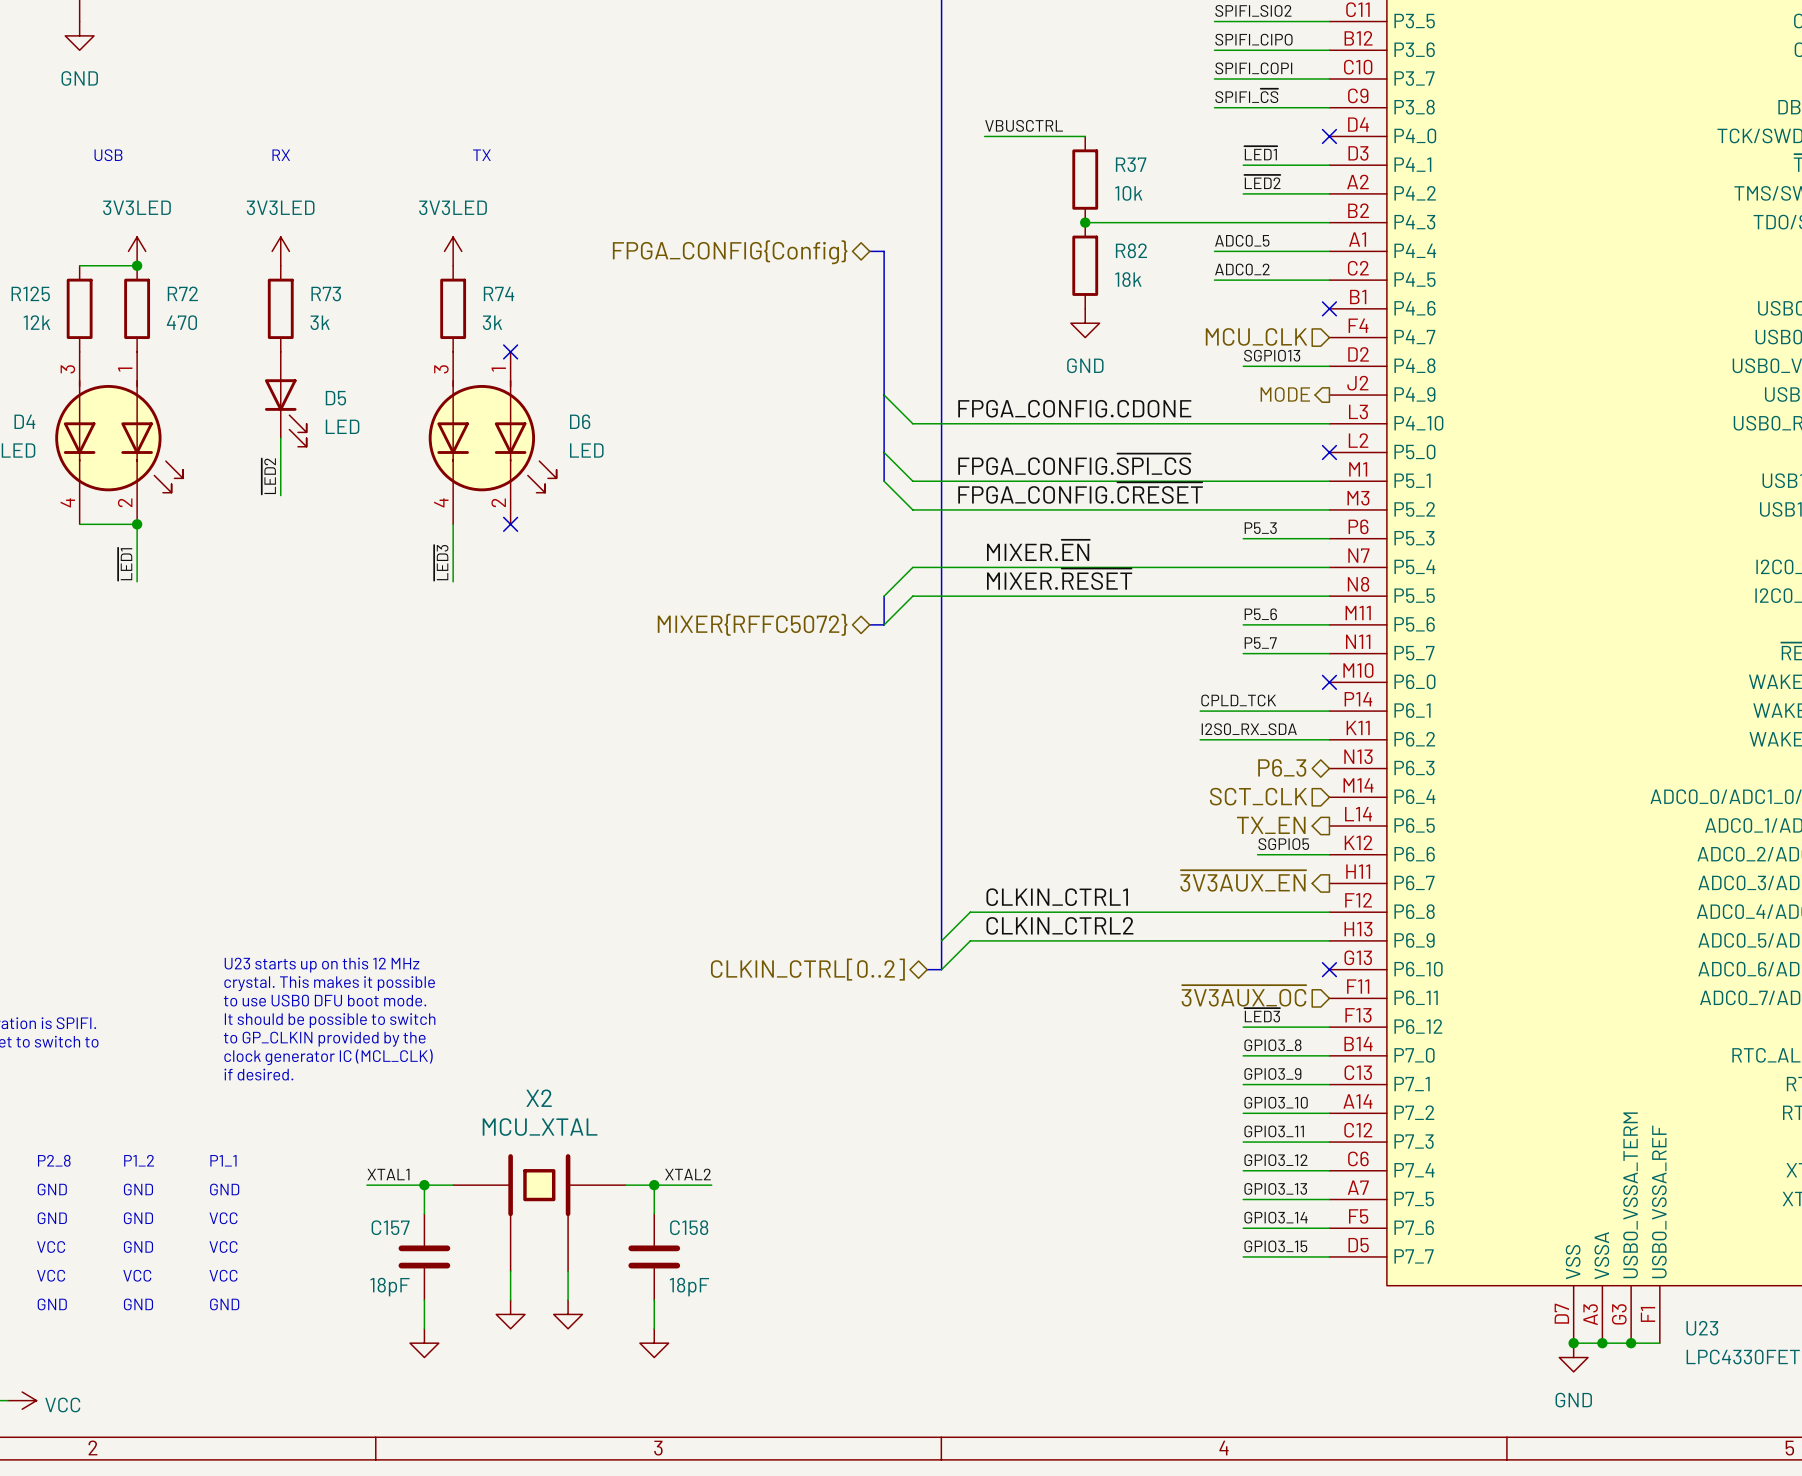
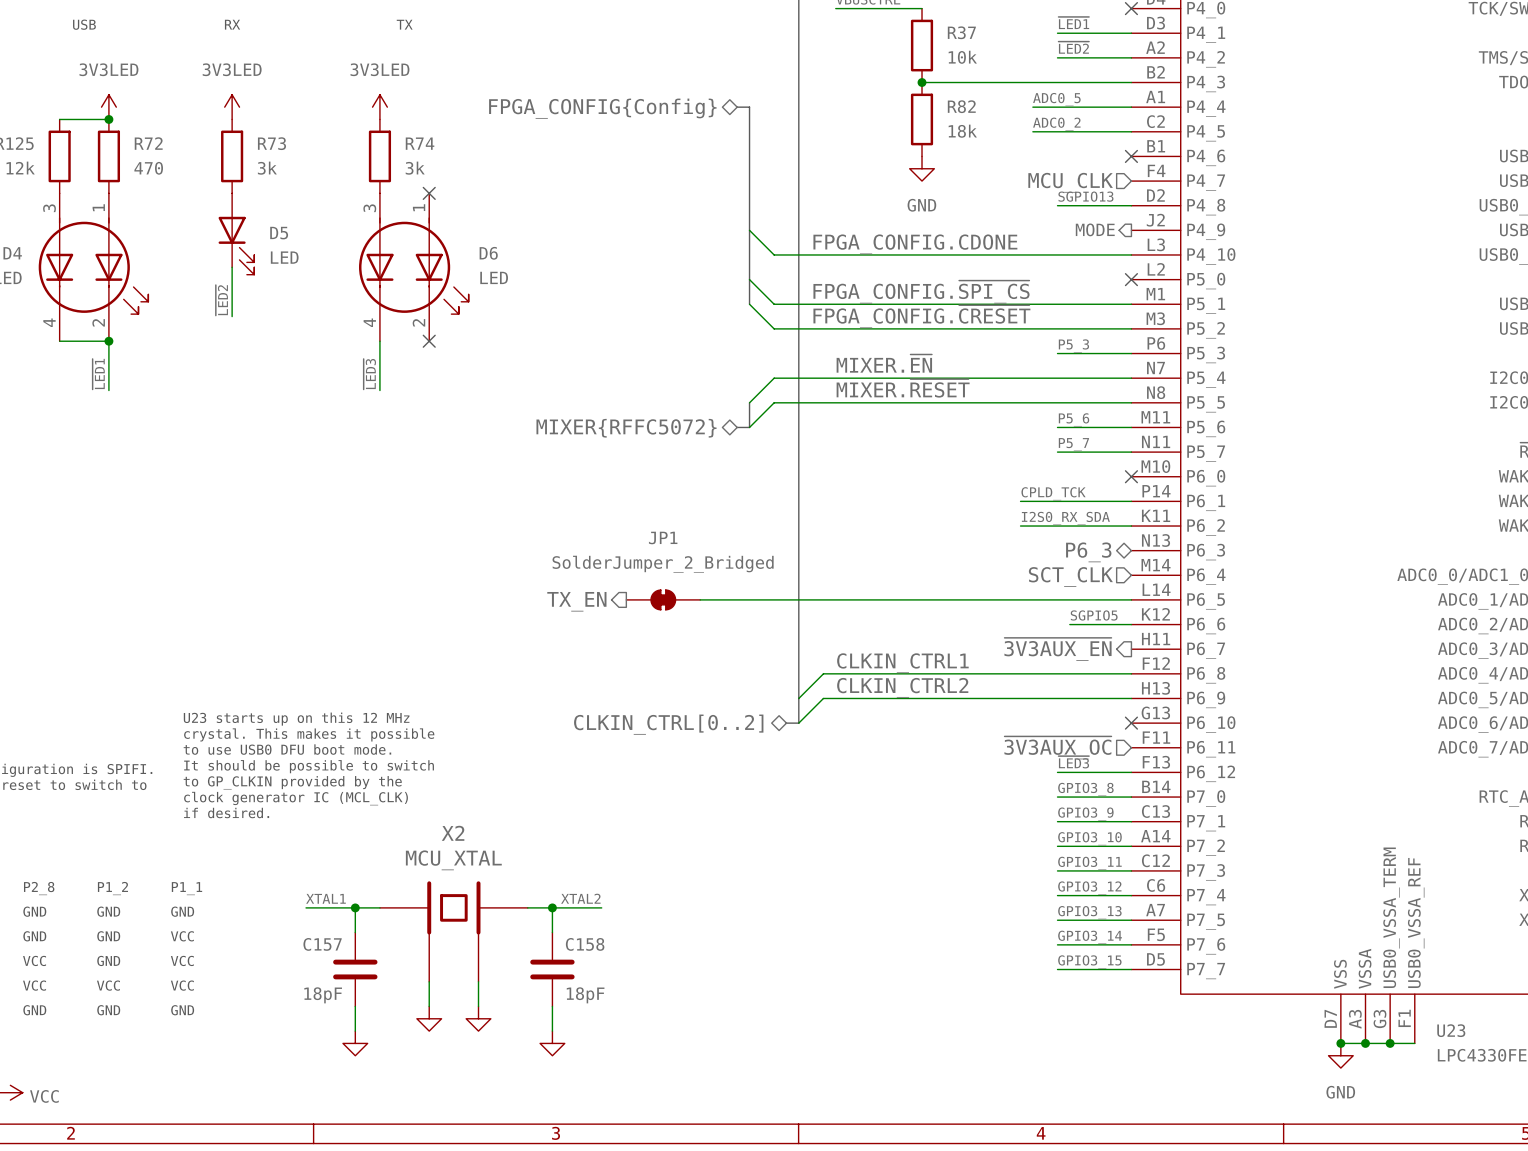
hierarchical label: none -> TX_EN (576, 601)
hierarchical label: TX_EN (1271, 825) -> none
JP1: none -> SolderJumper_2_Bridged (663, 599)
wire: none -> (700, 599) (1131, 599)

